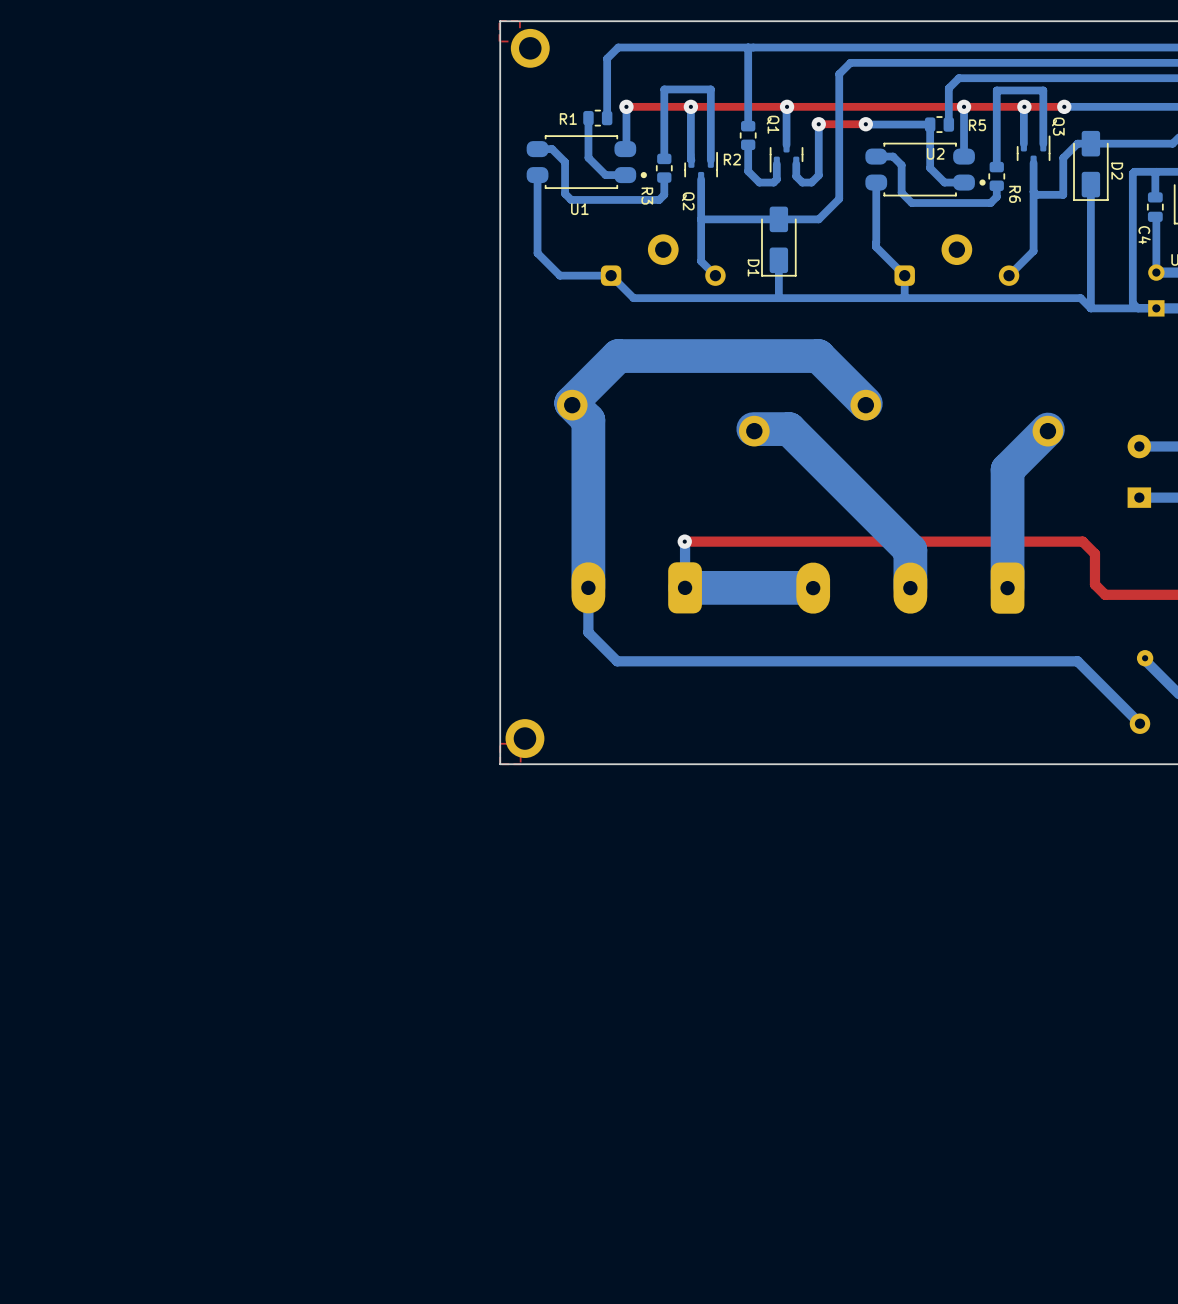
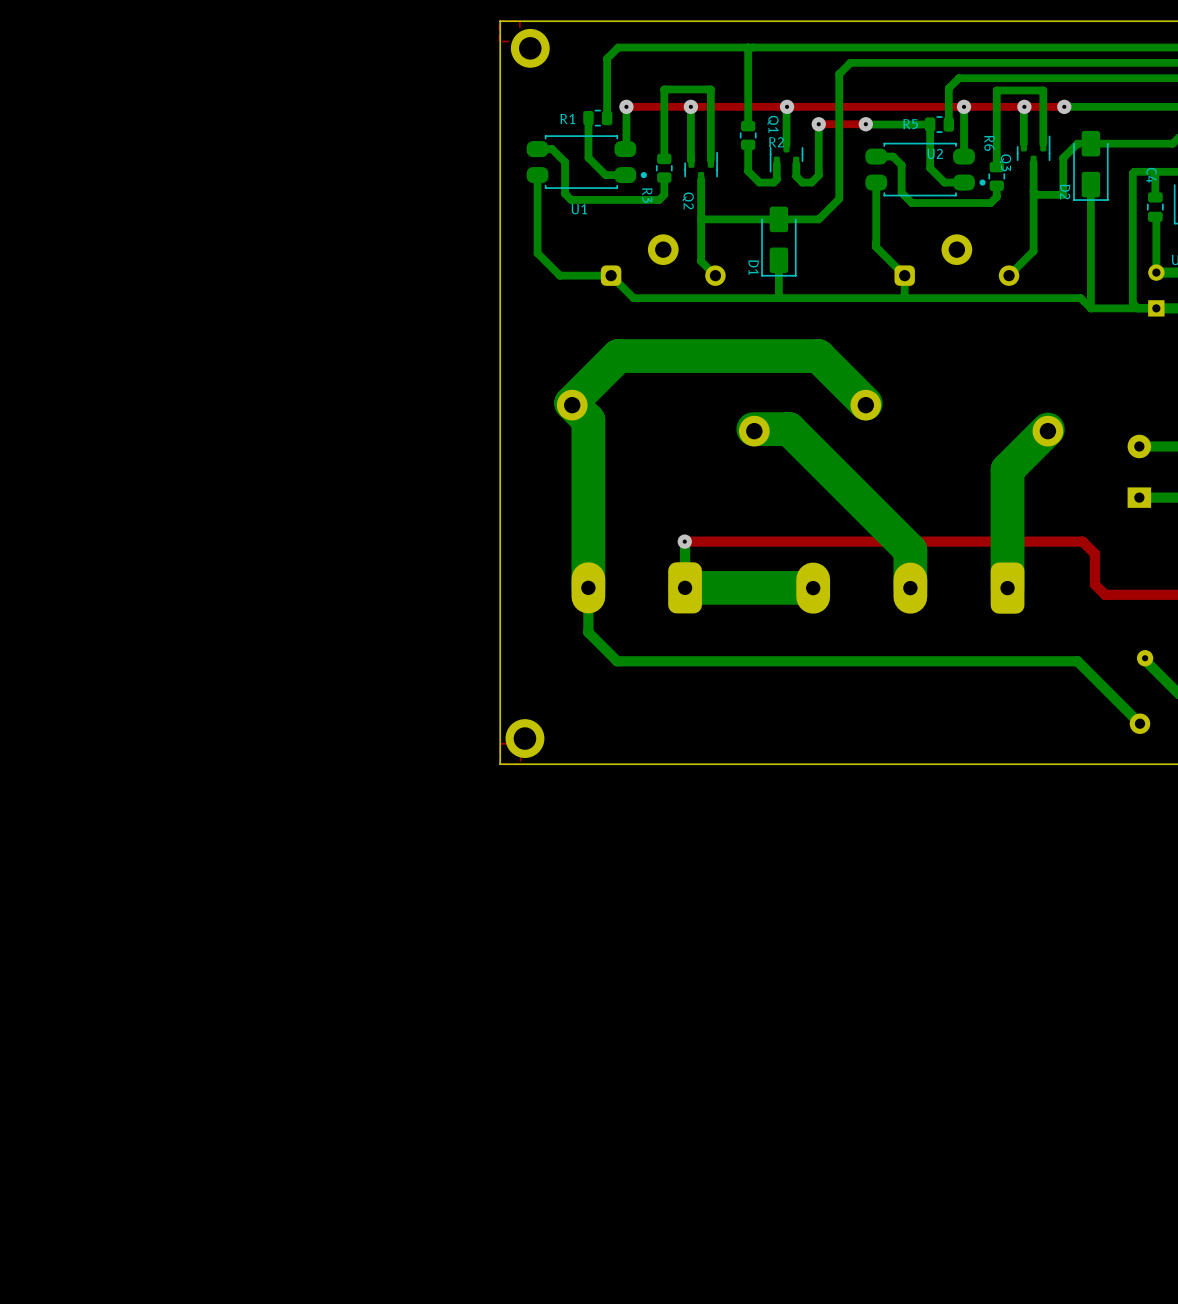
R5 name position: R5 (977, 125) -> R5 (910, 124)
Q3 name position: Q3 (1058, 126) -> Q3 (1005, 162)
R2 name position: R2 (732, 159) -> R2 (776, 142)
D2 name position: D2 (1117, 171) -> D2 (1065, 192)
R6 name position: R6 (1014, 194) -> R6 (989, 143)
C4 name position: C4 (1144, 235) -> C4 (1151, 175)

